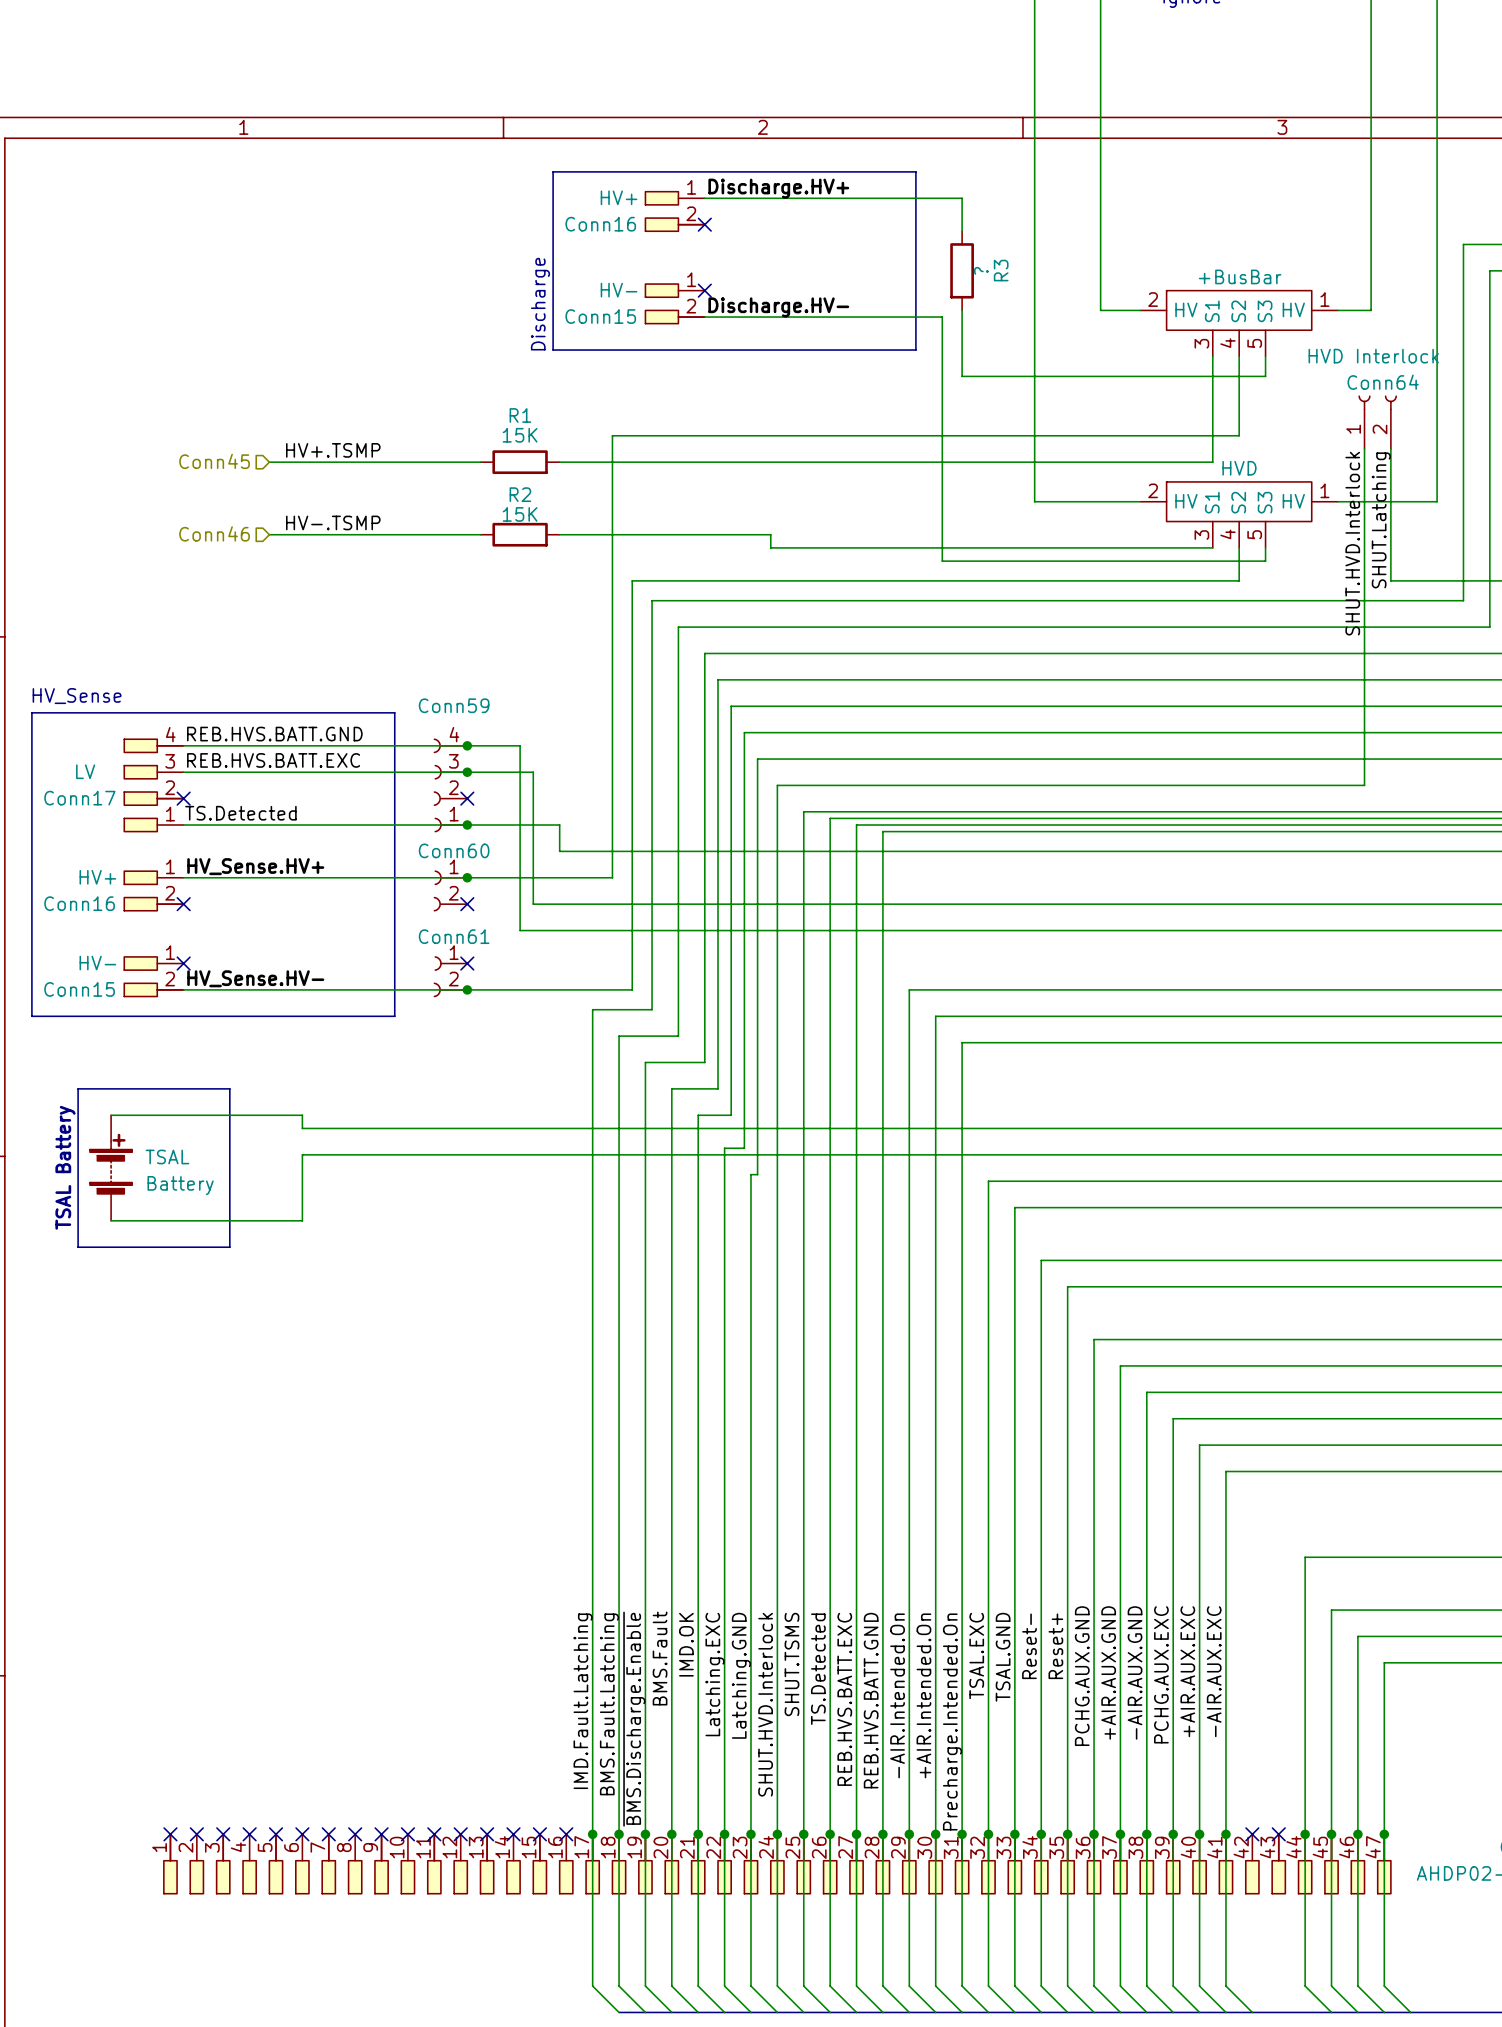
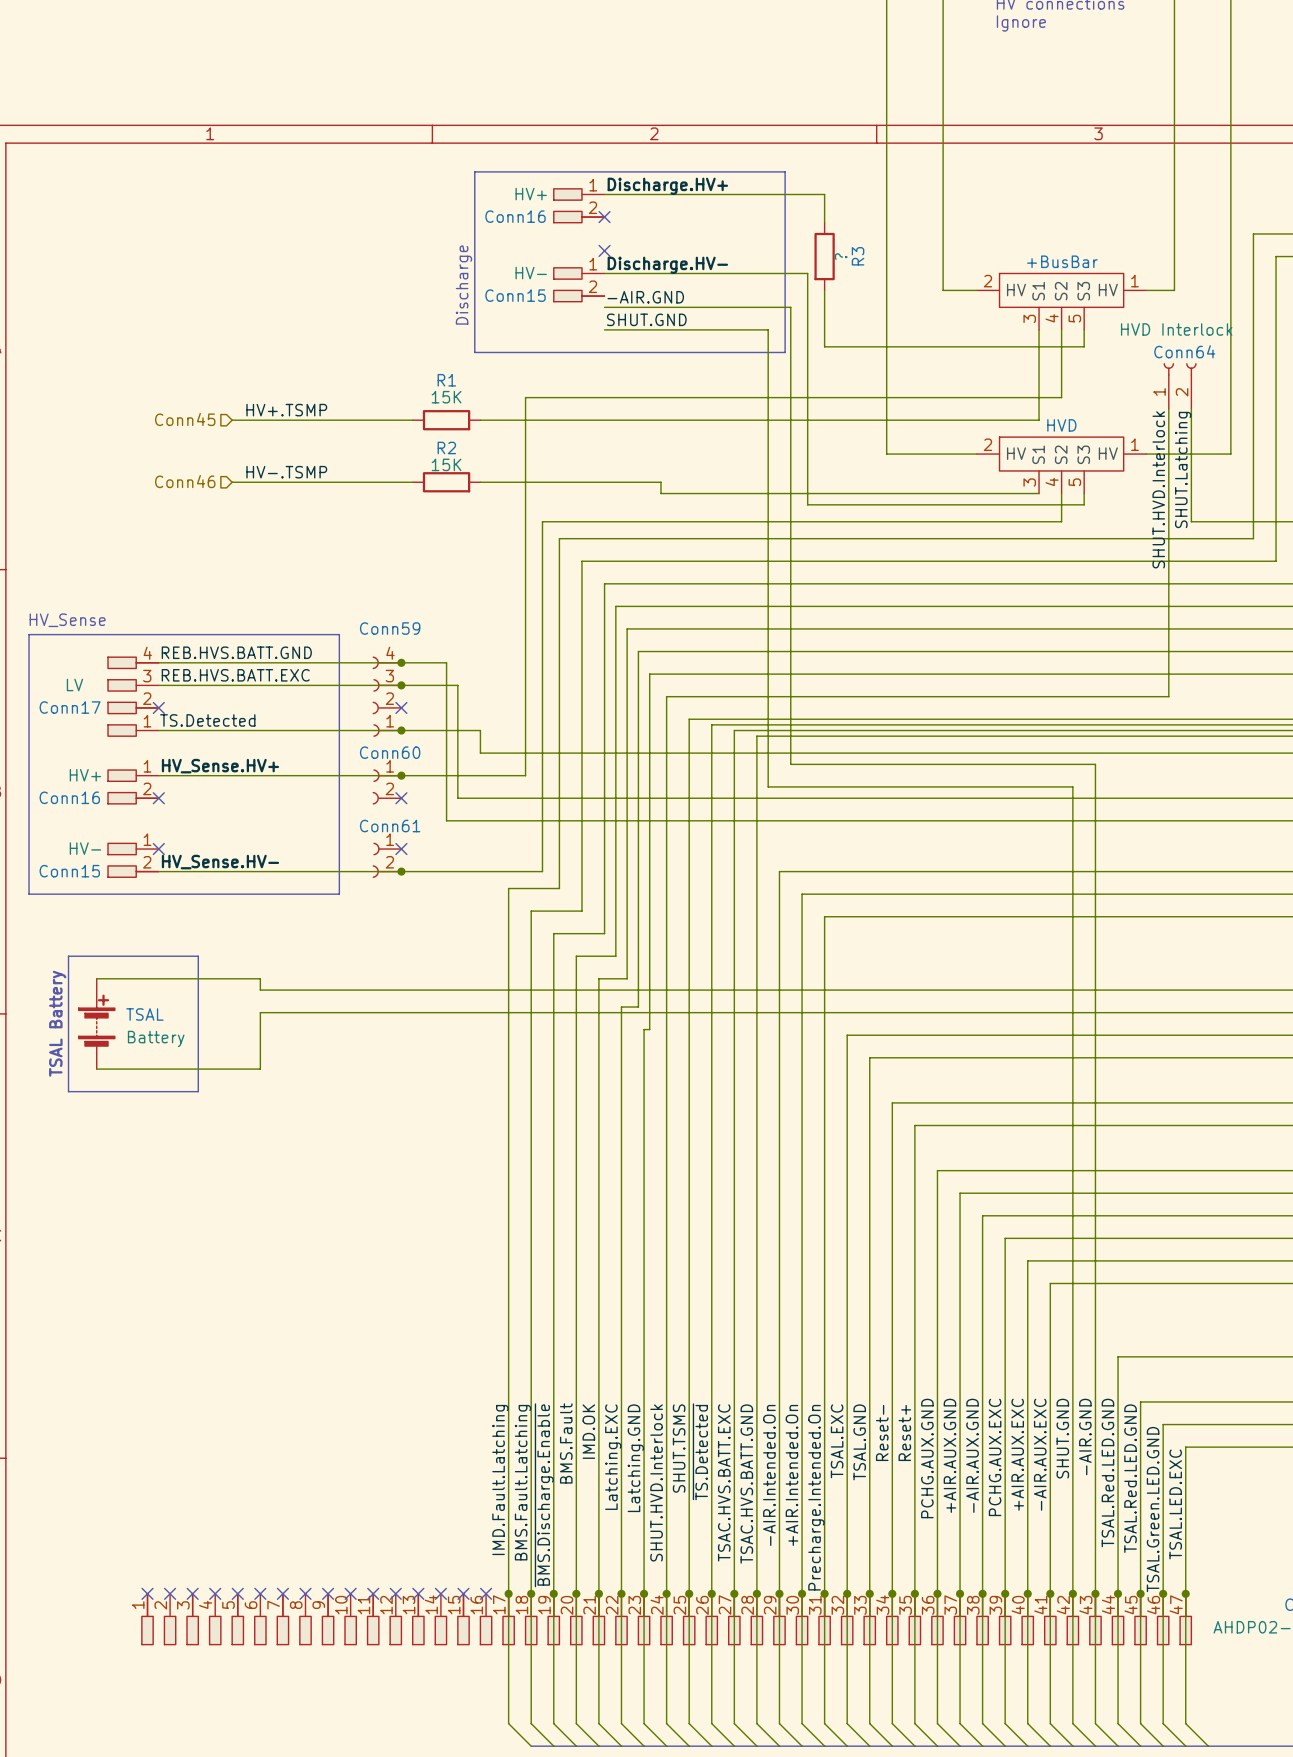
no-connect mark position: (704, 290) -> (604, 250)
label position: Discharge.HV- (778, 307) -> Discharge.HV- (667, 265)
wire: (704, 317) (942, 317) -> (604, 273) (807, 273) (807, 296)
label: none -> -AIR.GND (645, 297)
wire: none -> (604, 307) (790, 307) (790, 764) (1095, 764) (1095, 1723) (1118, 1746)
label: none -> SHUT.GND (646, 319)
line: (553, 350) (915, 350) -> (474, 324) (474, 352) (785, 352) (785, 324)
wire: none -> (604, 329) (768, 329) (768, 786) (1072, 786) (1072, 1723) (1095, 1746)
label: none -> -AIR.GND (1085, 1437)
label: none -> SHUT.GND (1062, 1438)
label: TS.Detected (818, 1669) -> ~{TS.Detected} (700, 1451)
label: none -> TSAL.Red.LED.GND (1107, 1473)
label: REB.HVS.BATT.EXC (844, 1699) -> TSAC.HVS.BATT.EXC (724, 1482)
label: none -> TSAL.Red.LED.GND (1130, 1478)
label: REB.HVS.BATT.GND (871, 1700) -> TSAC.HVS.BATT.GND (746, 1484)
label: none -> TSAL.LED.EXC (1175, 1504)
label: none -> TSAL.Green.LED.GND (1153, 1509)
no-connect mark: (1252, 1834) -> none
junction: none -> (1072, 1593)
no-connect mark: (1278, 1834) -> none
junction: none -> (1095, 1593)

